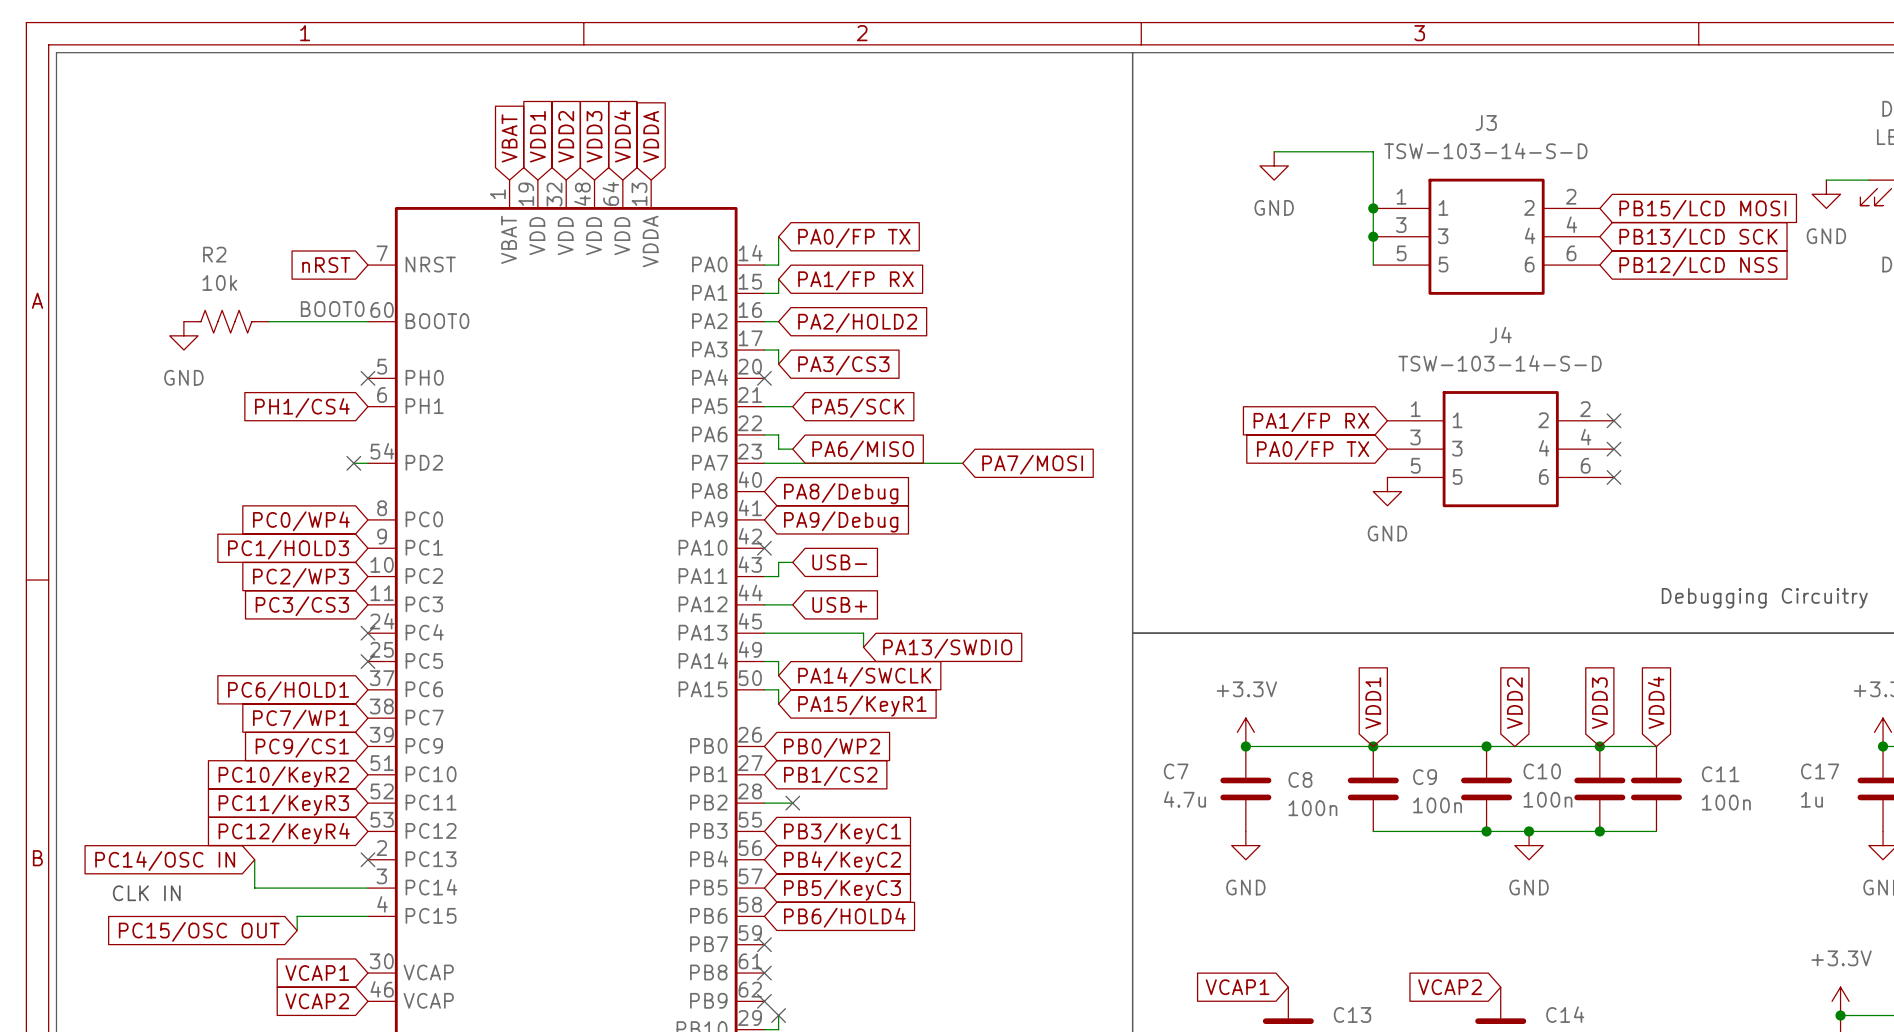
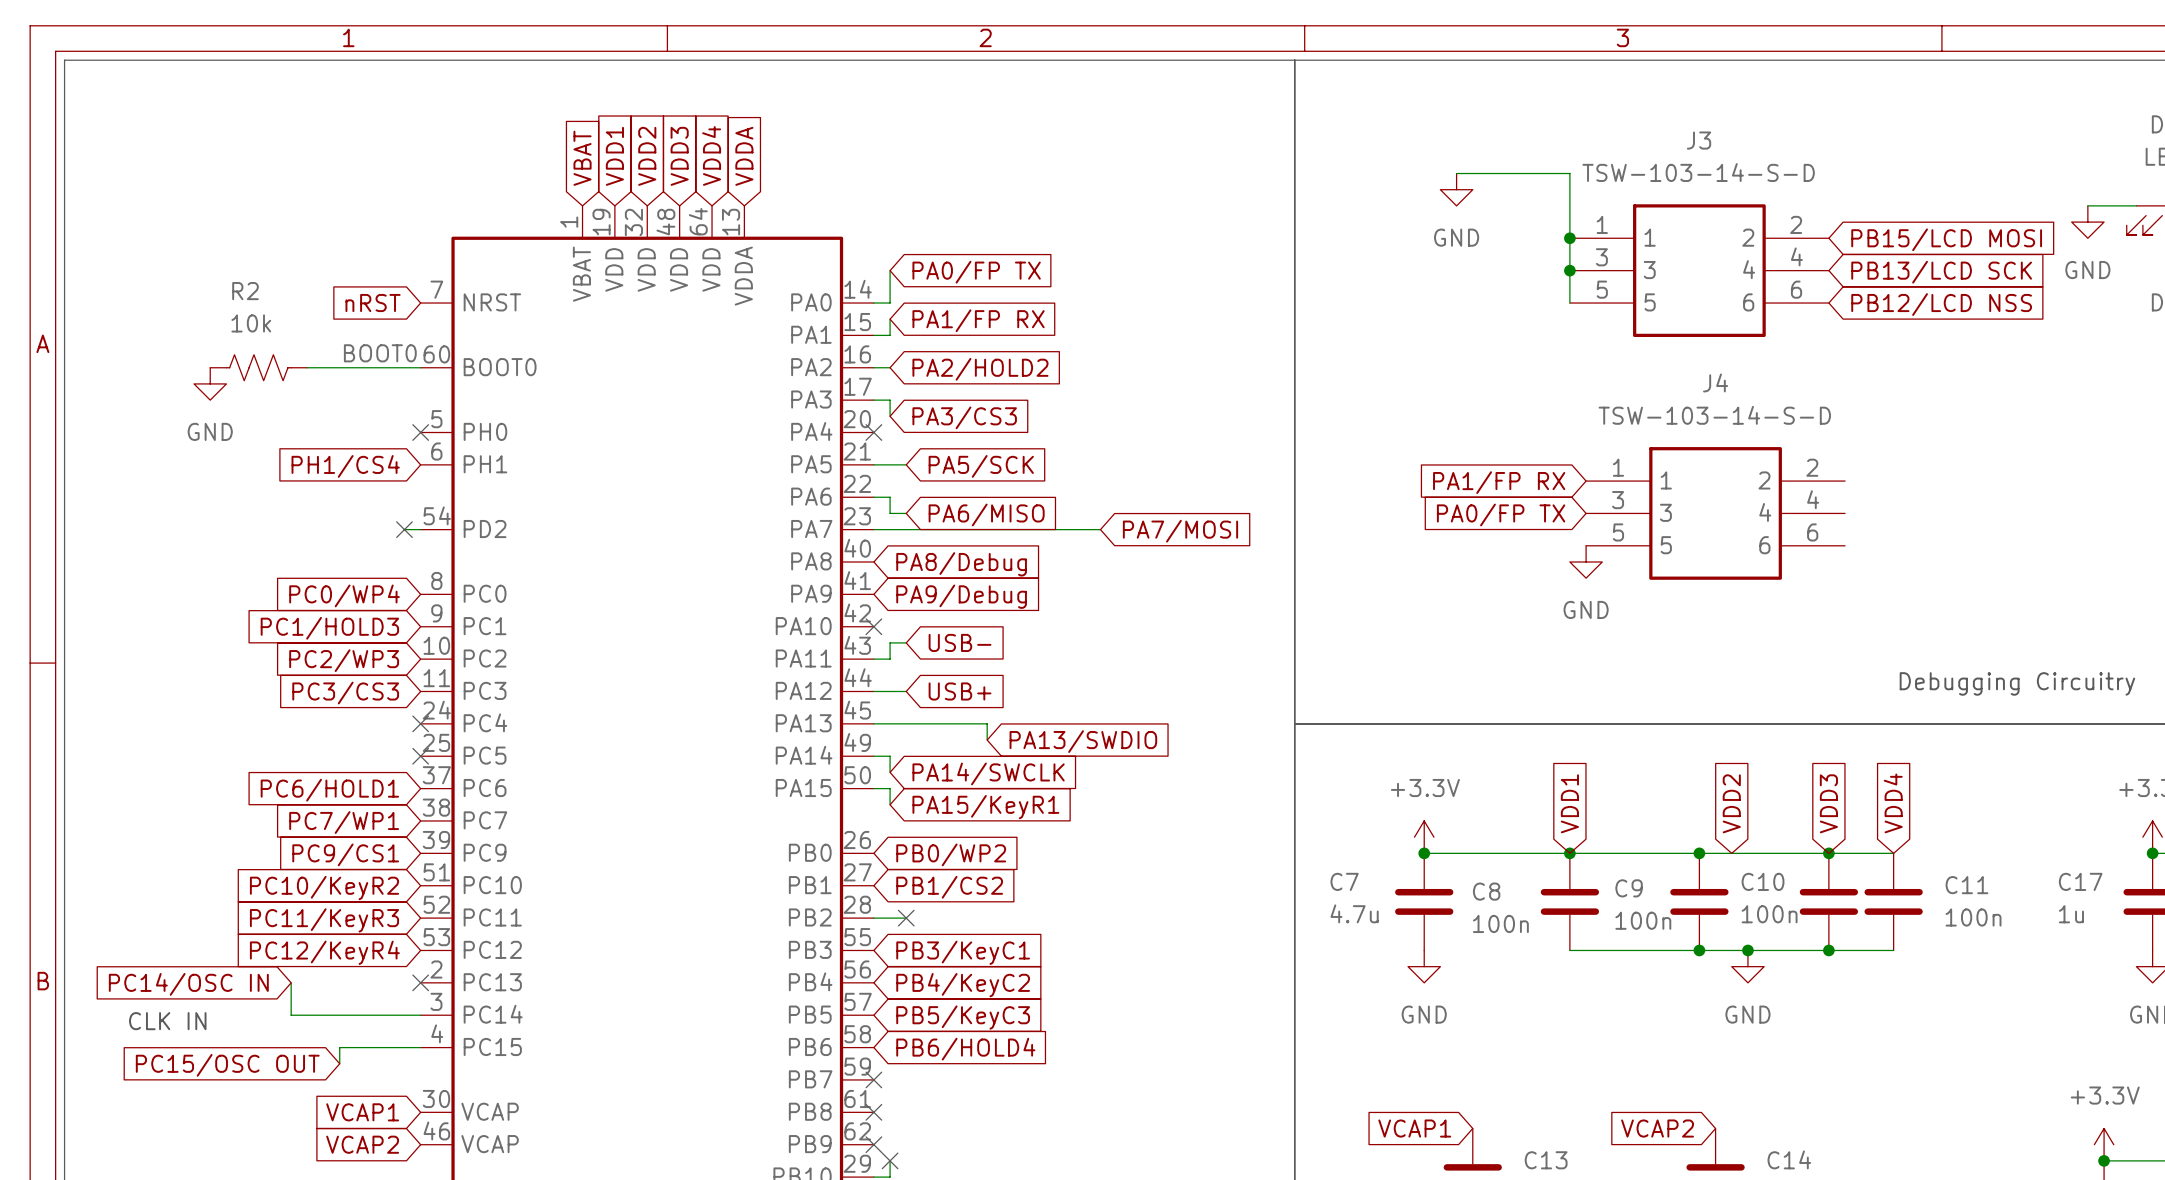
no-connect mark: (1614, 420) -> none
no-connect mark: (1614, 449) -> none
no-connect mark: (1614, 477) -> none

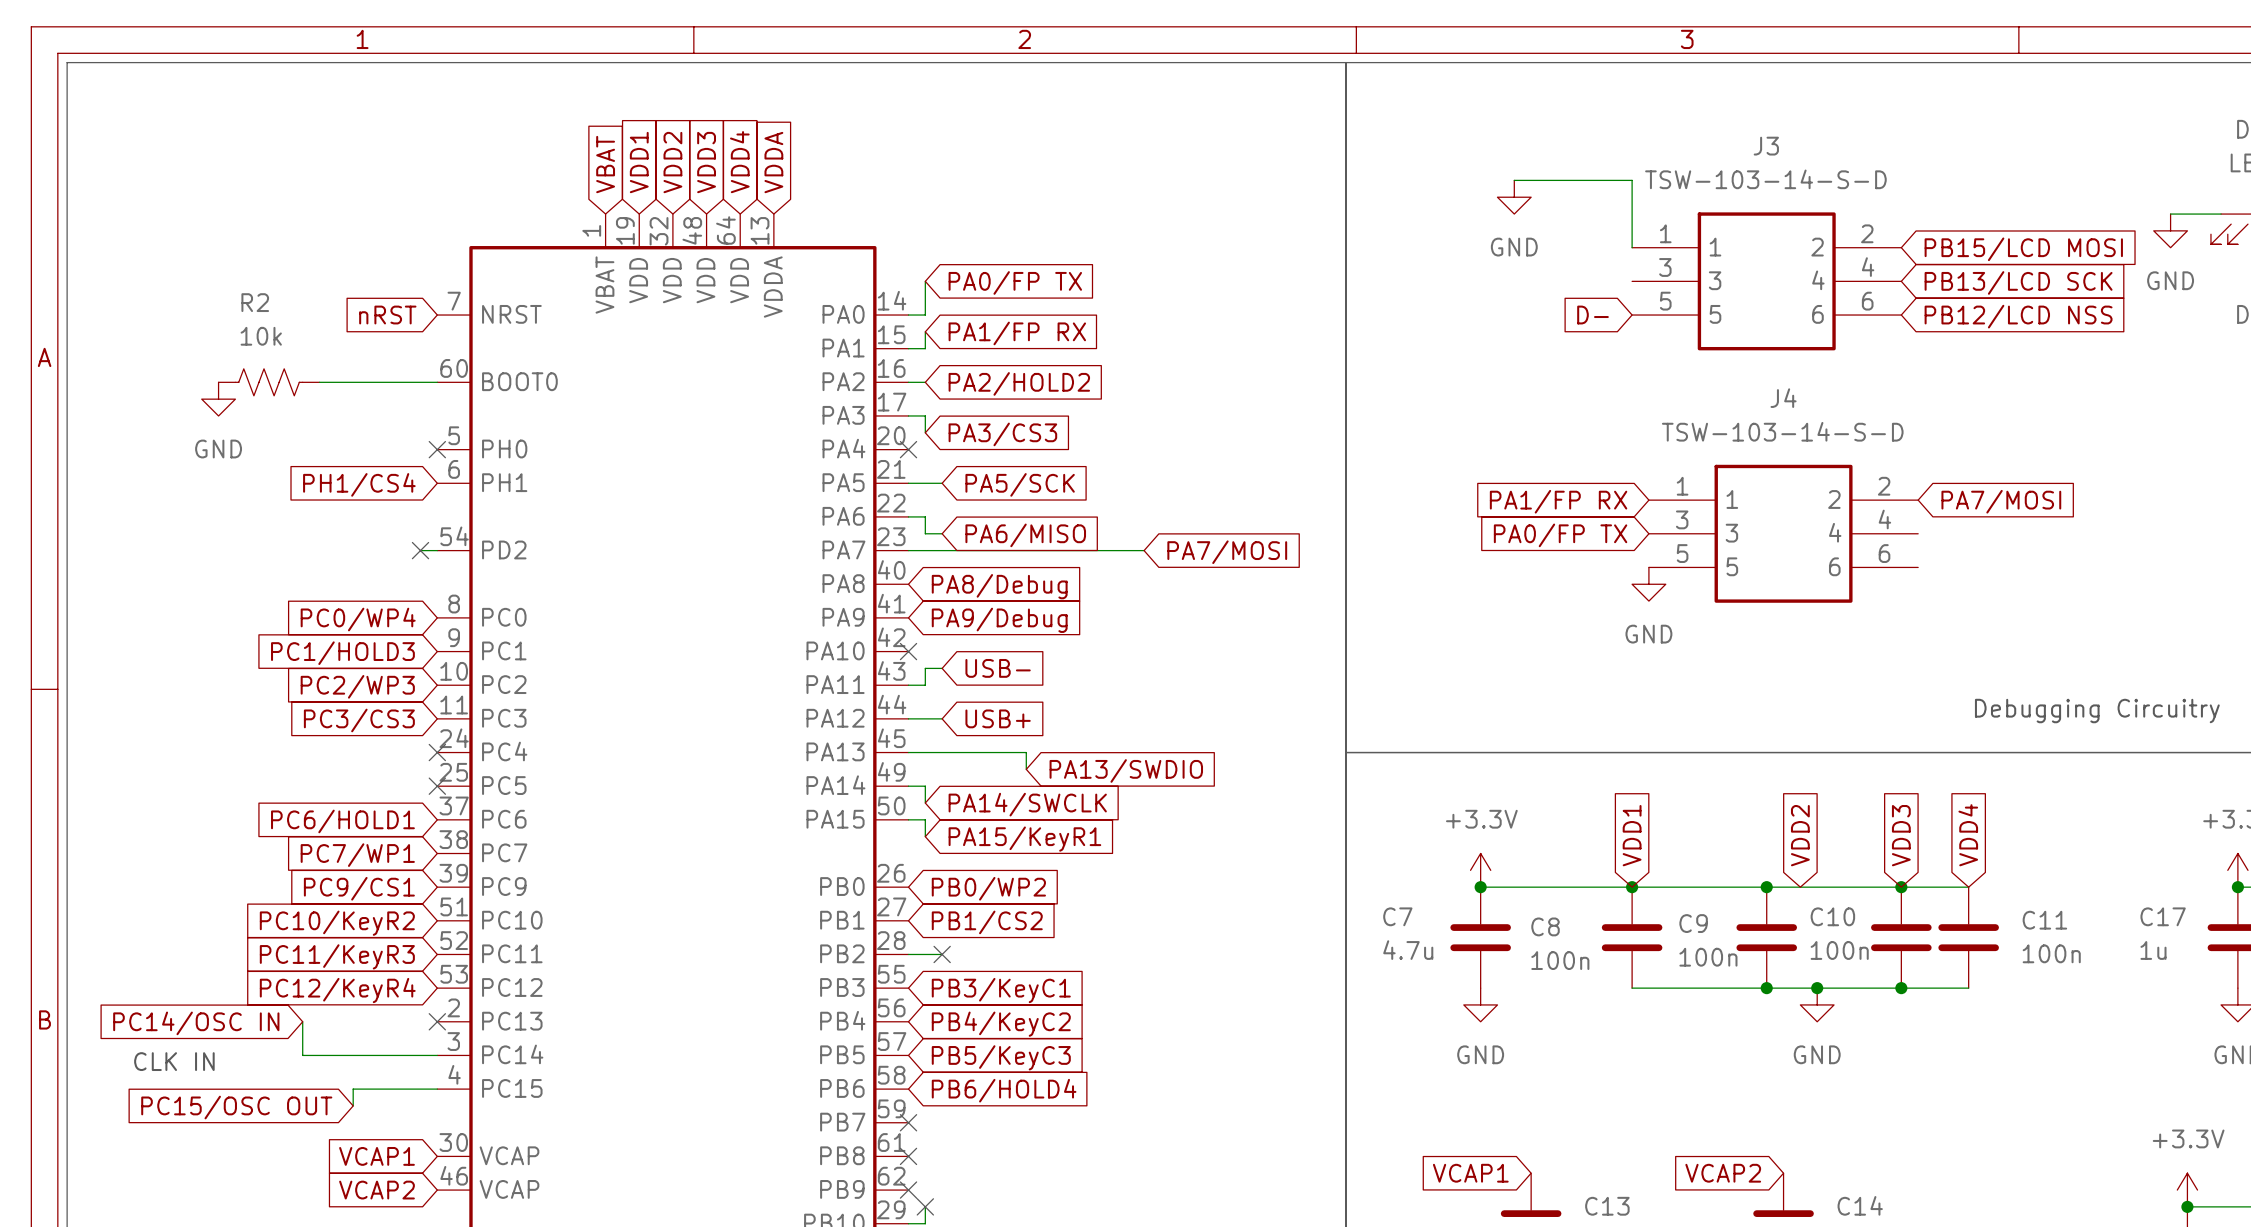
wire: (1569, 238) (1569, 303) -> none
junction: (1569, 238) -> none
junction: (1569, 270) -> none
global label: none -> D- (1593, 315)
label: BOOT0 (380, 353) -> none
global label: none -> PA7/MOSI (2001, 501)

